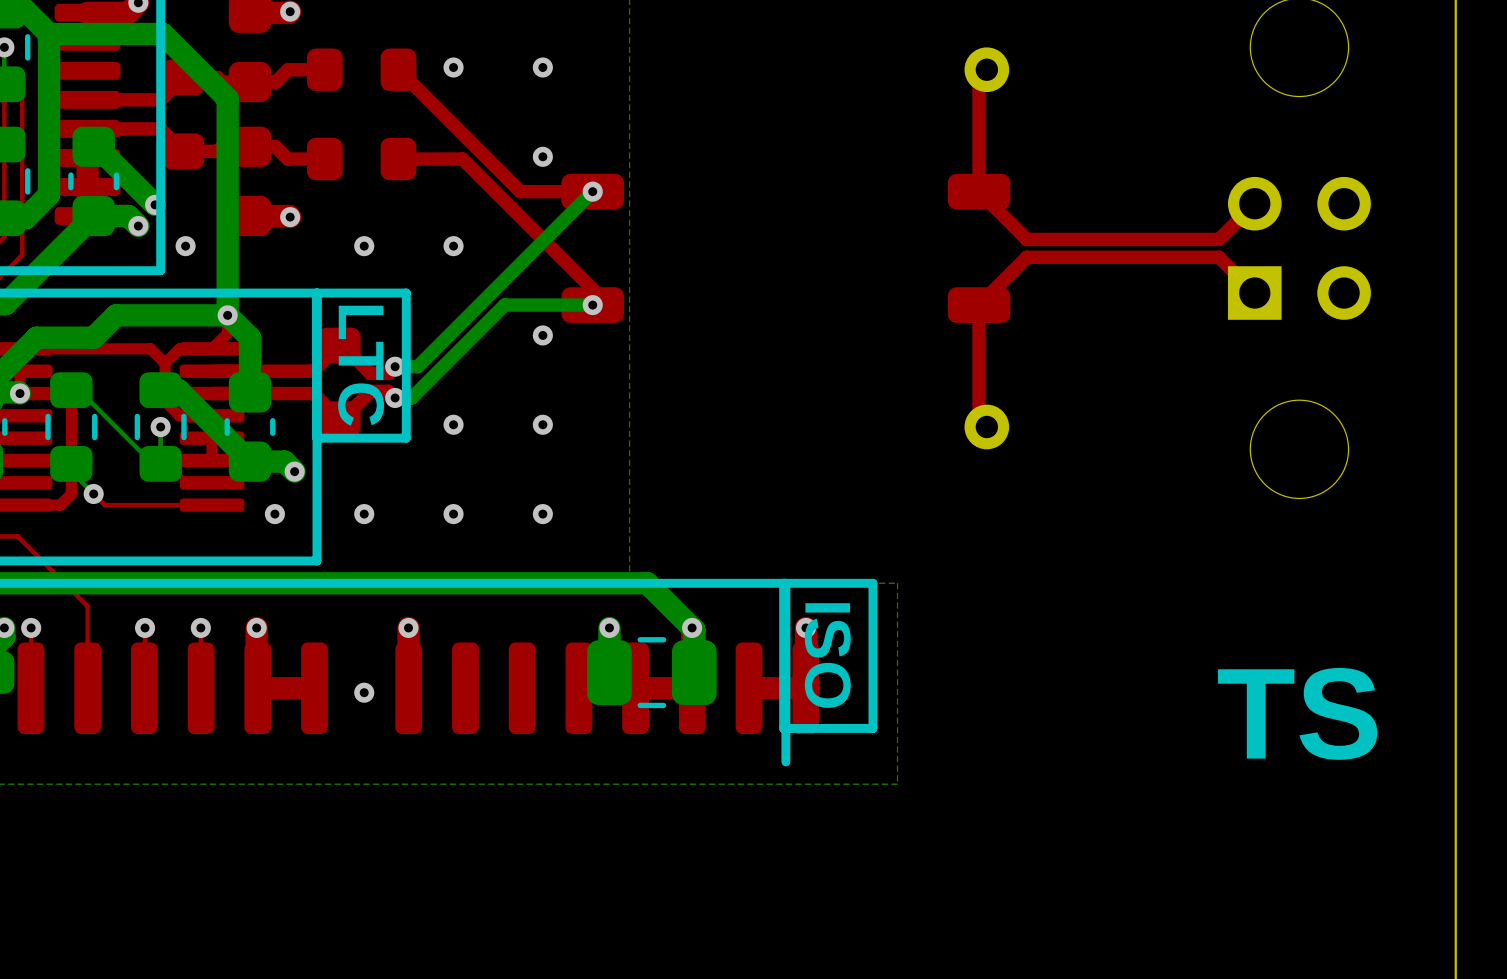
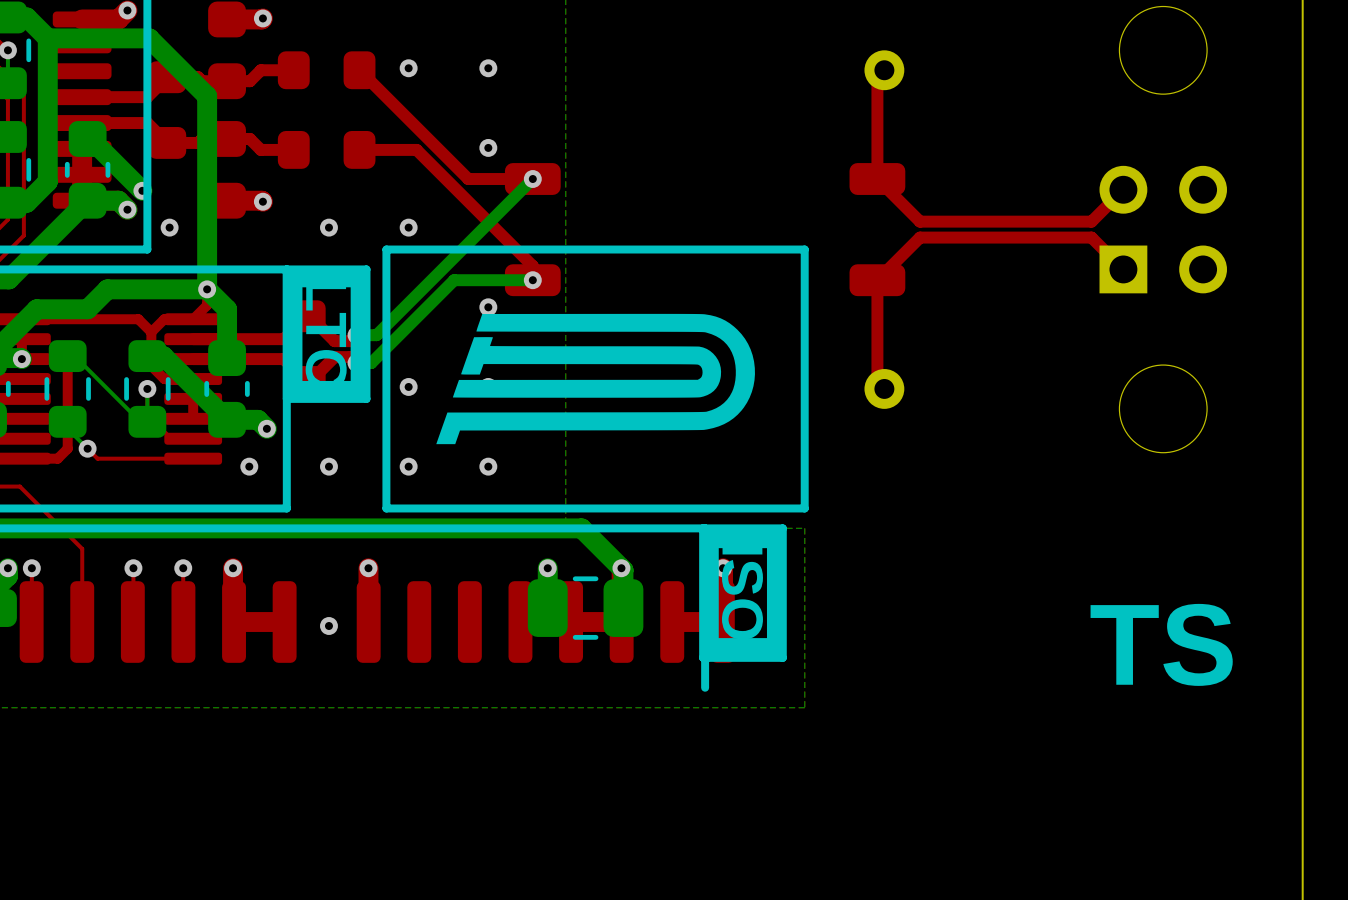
line: none -> (804, 249) (386, 249) (386, 508) (804, 508) (804, 249)
drawing: none -> [286, 269, 367, 399]
drawing: none -> [436, 313, 755, 445]
drawing: none -> [705, 528, 783, 658]

